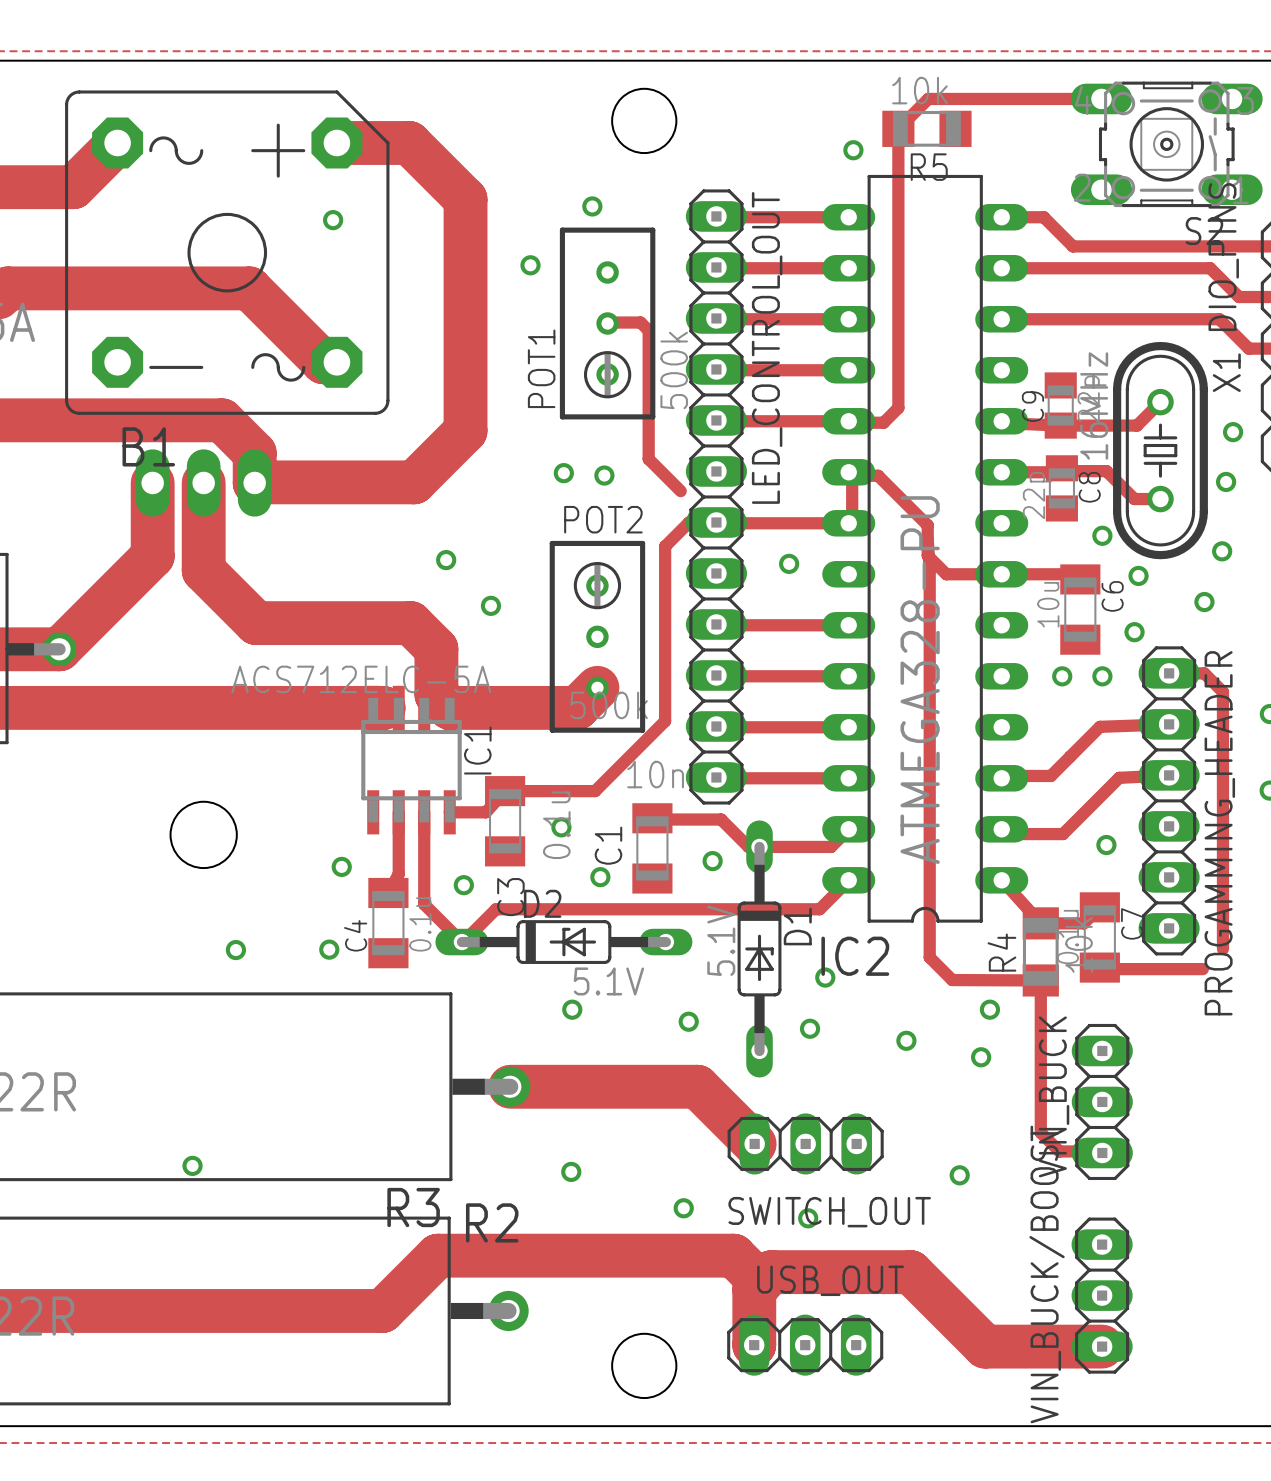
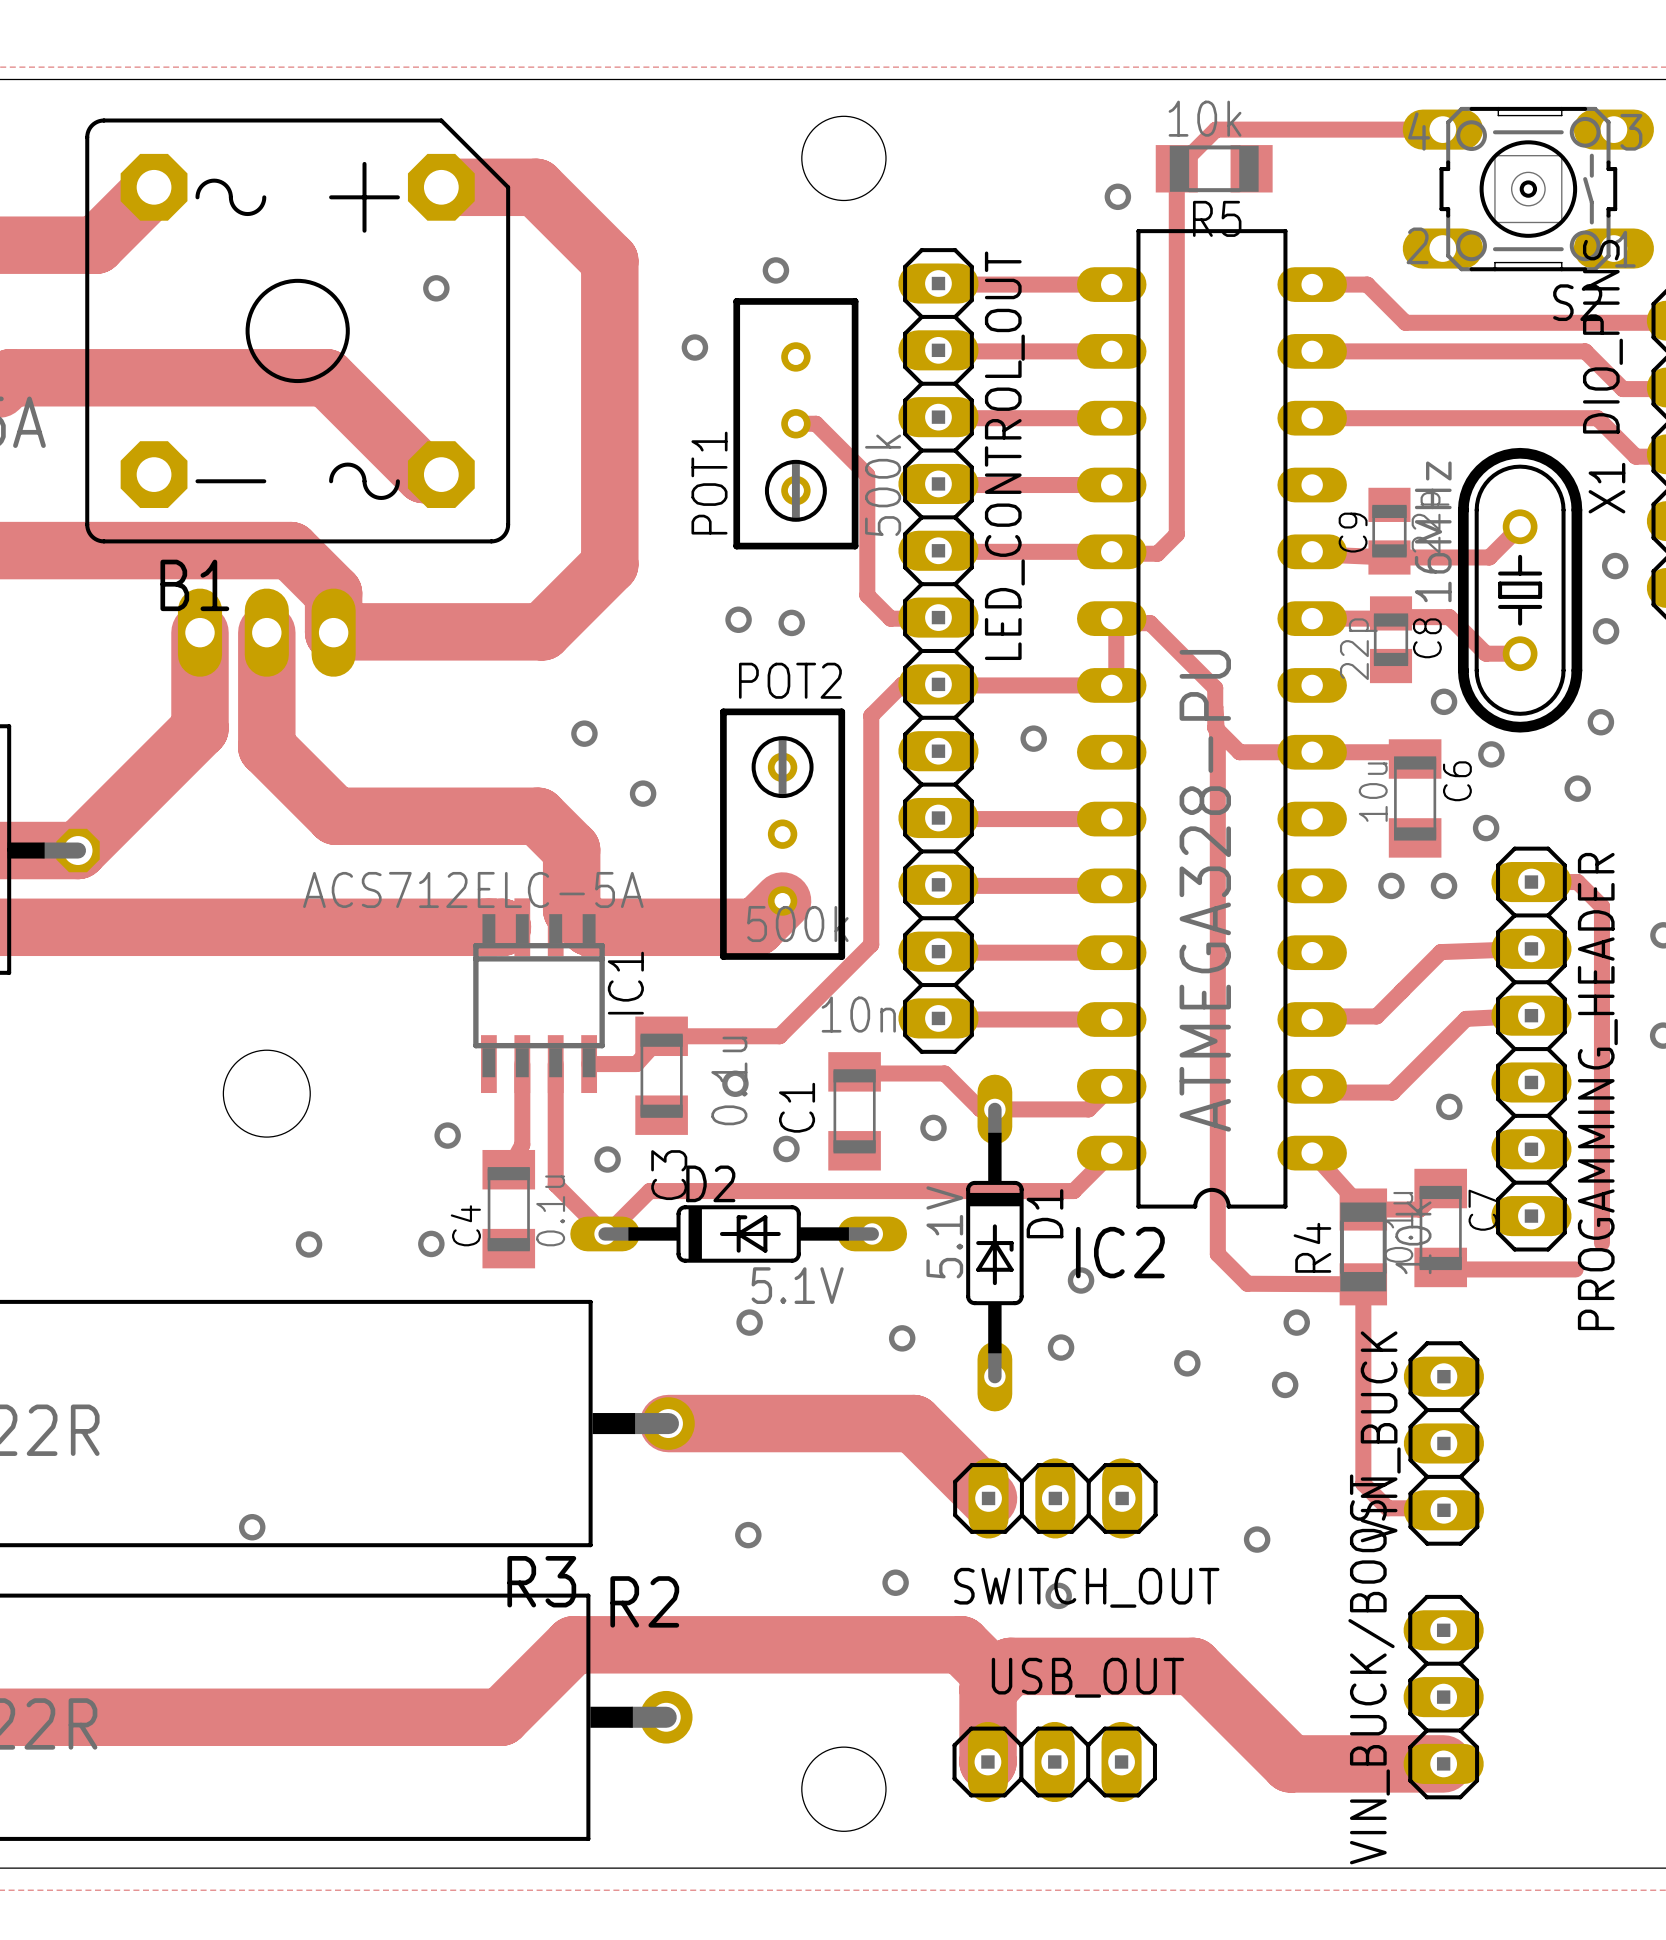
track: (607, 323) (640, 322) (648, 330) (648, 459) (680, 491) -> (795, 423) (815, 423) (867, 475) (867, 595) (890, 618) (938, 617)

